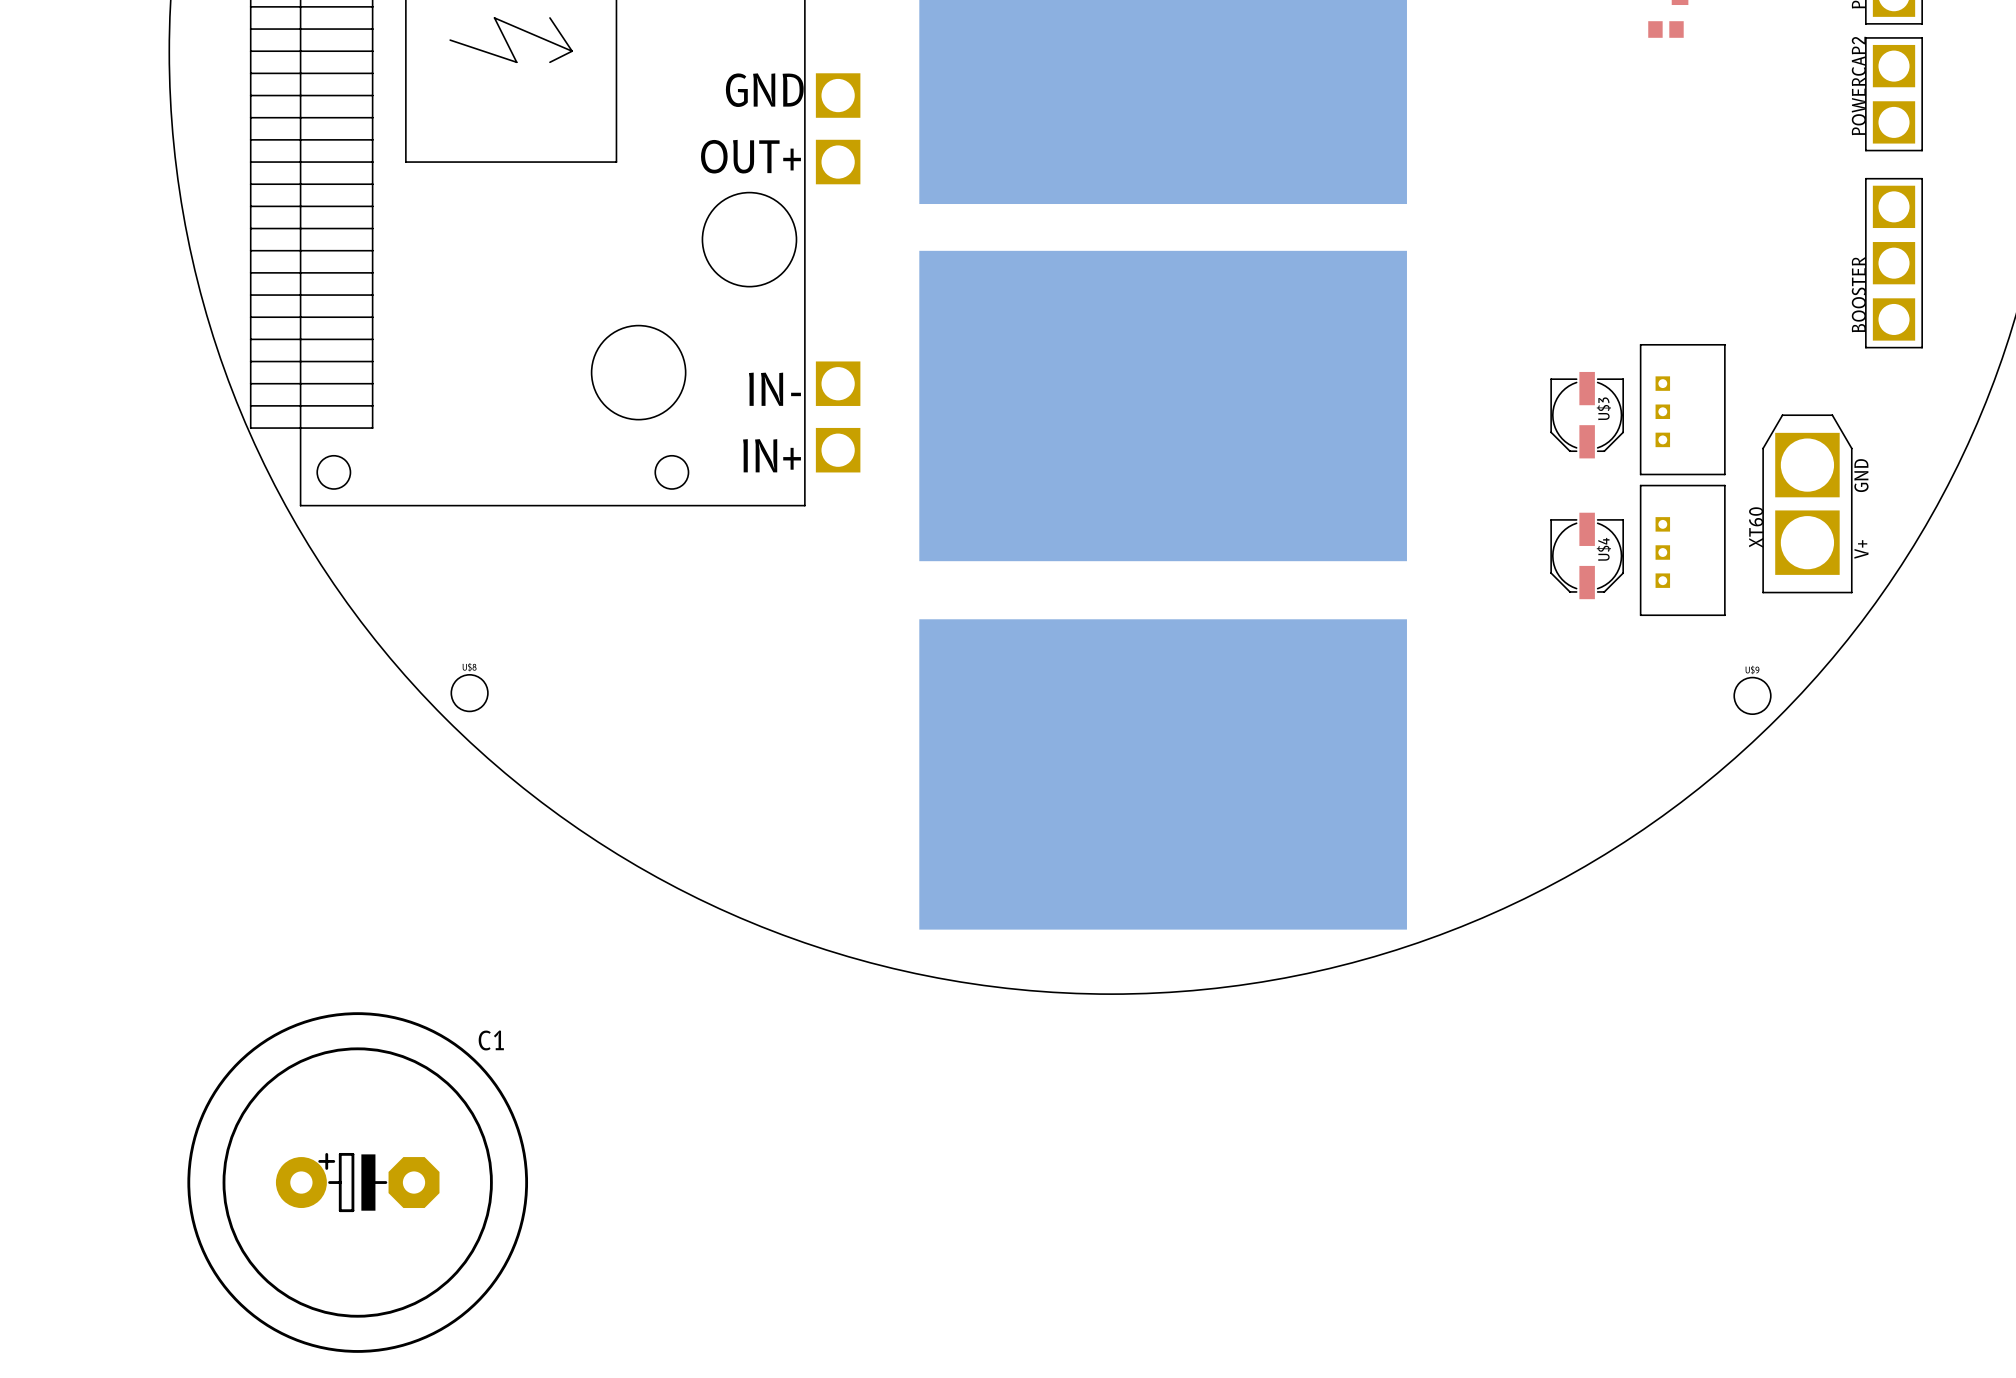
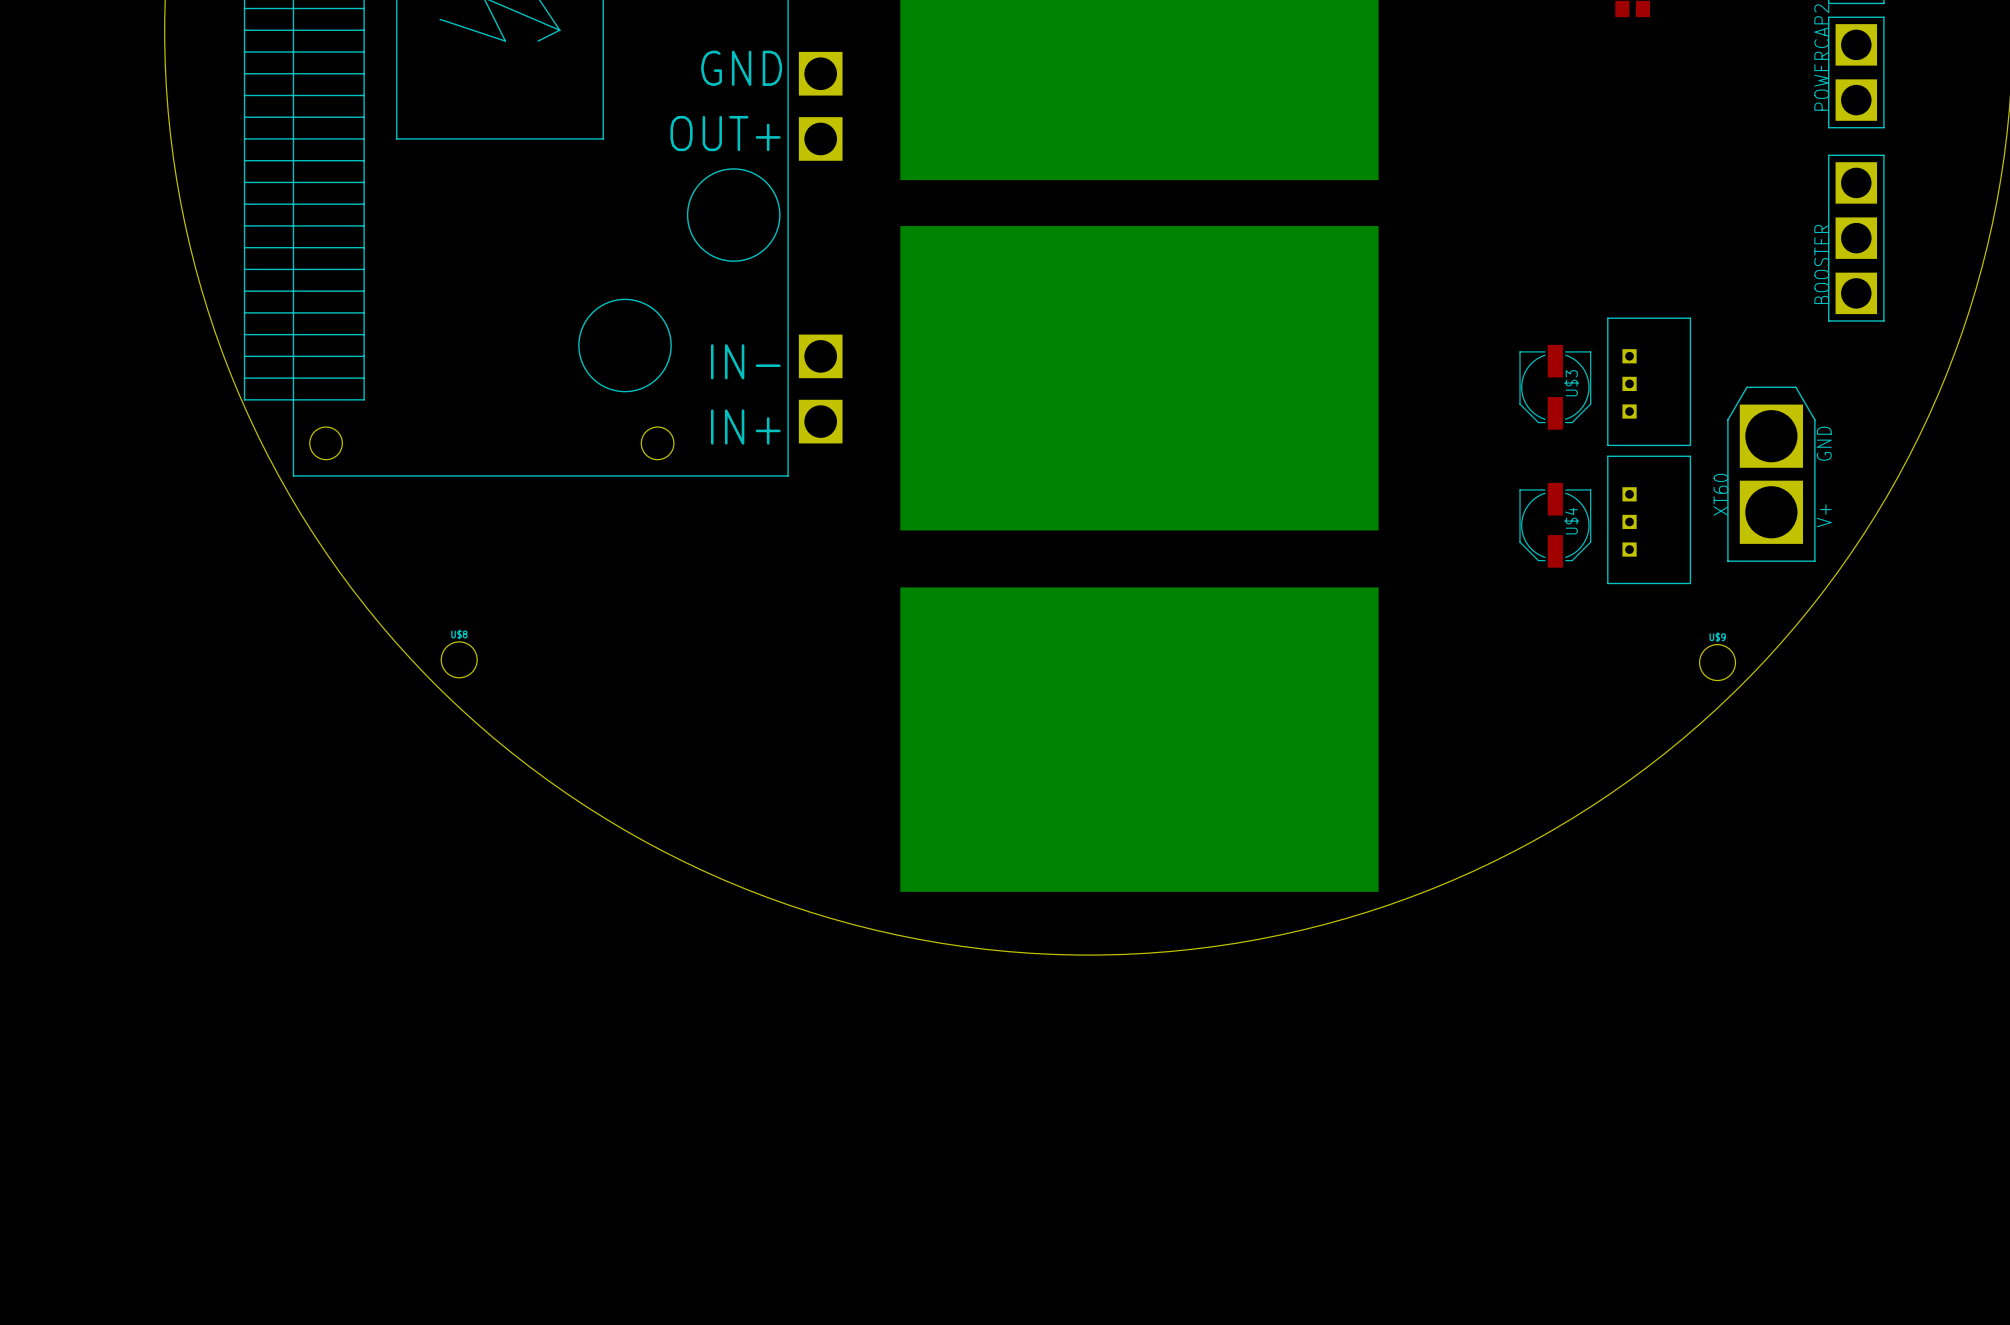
C1: (357, 1182) -> none

